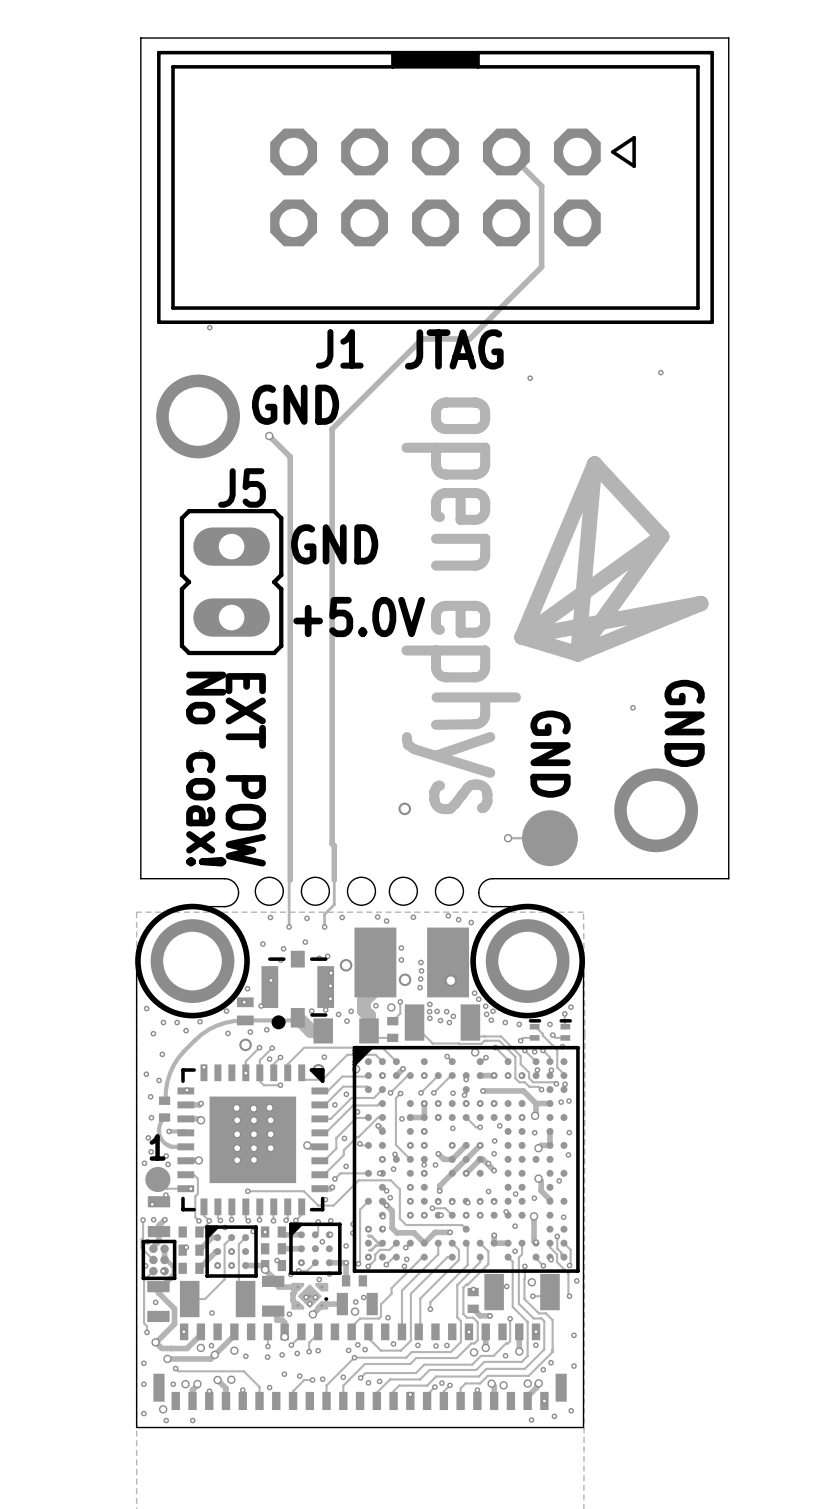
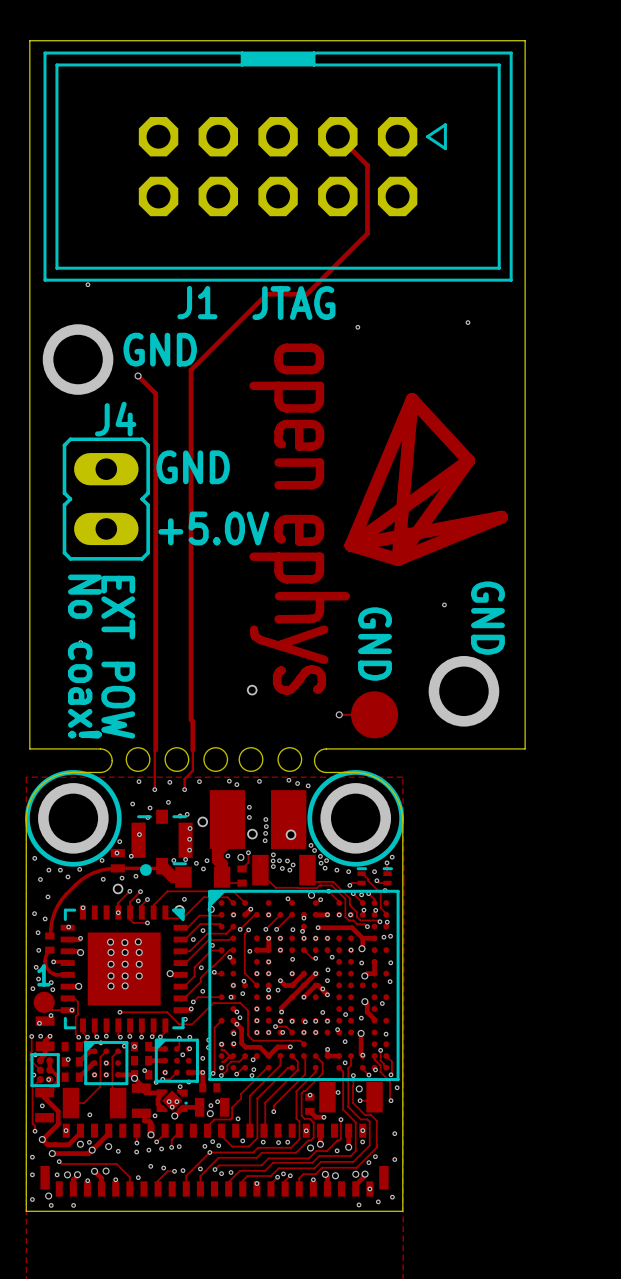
J5 name: J5 (241, 487) -> J4 (115, 419)

